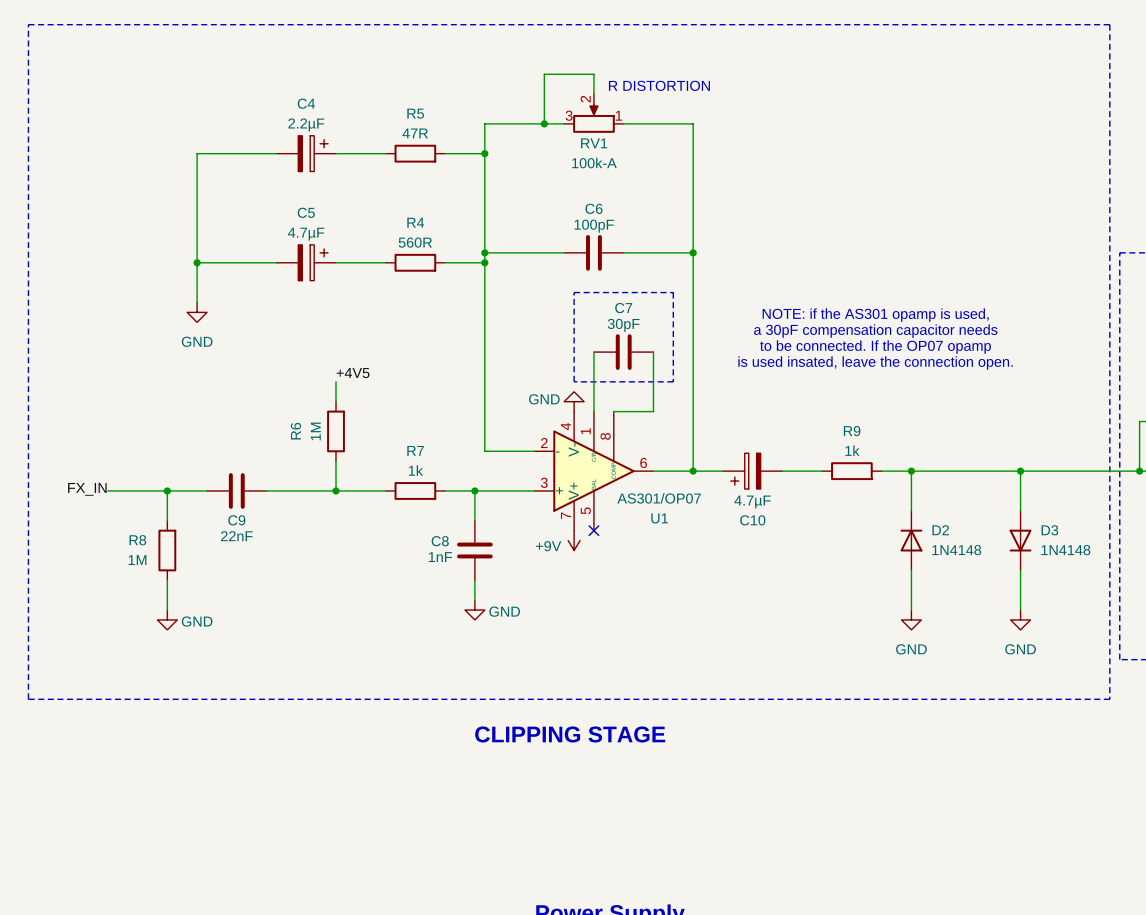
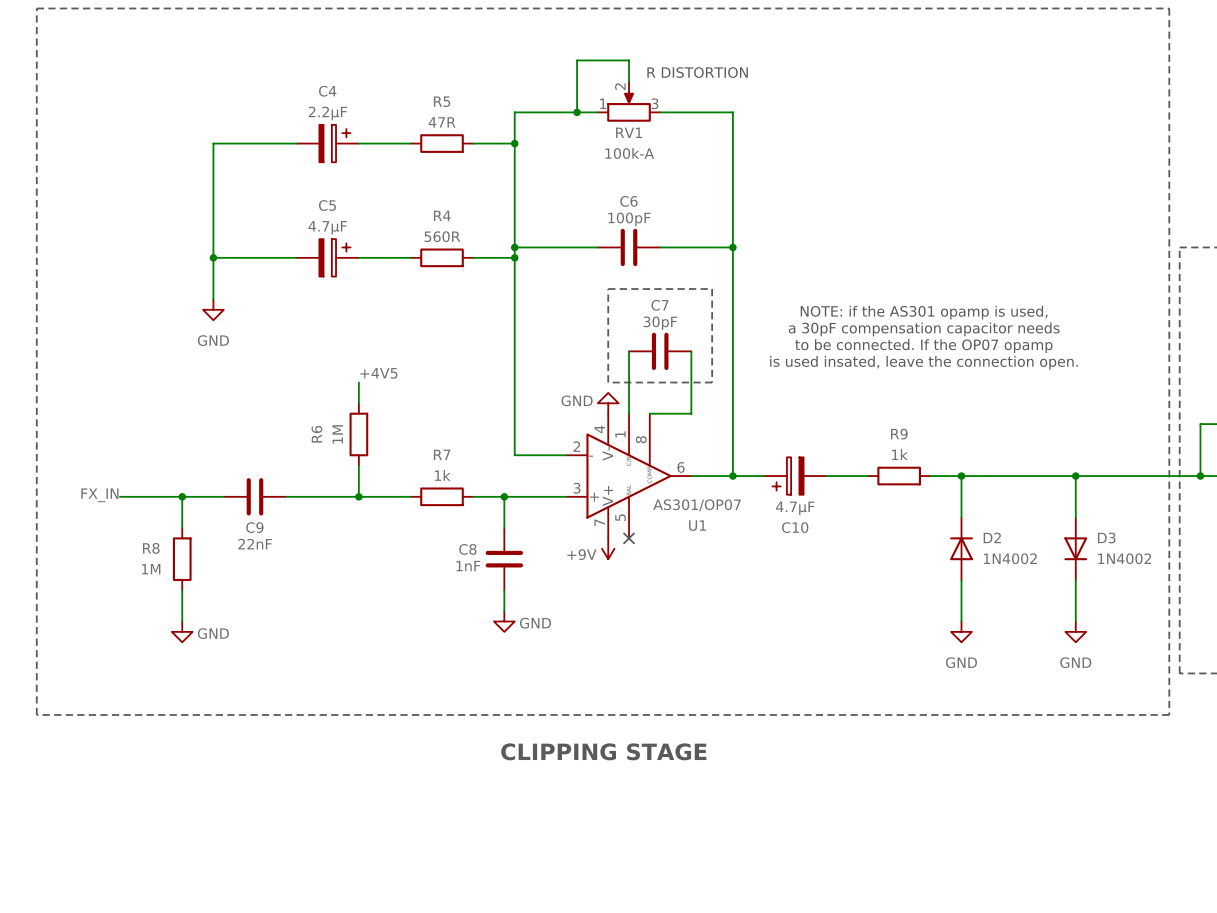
RV1 flip: as is (593, 118) -> left-right (629, 106)
D2 value: 1N4148 (956, 550) -> 1N4002 (1010, 558)
D3 value: 1N4148 (1065, 550) -> 1N4002 (1124, 558)

